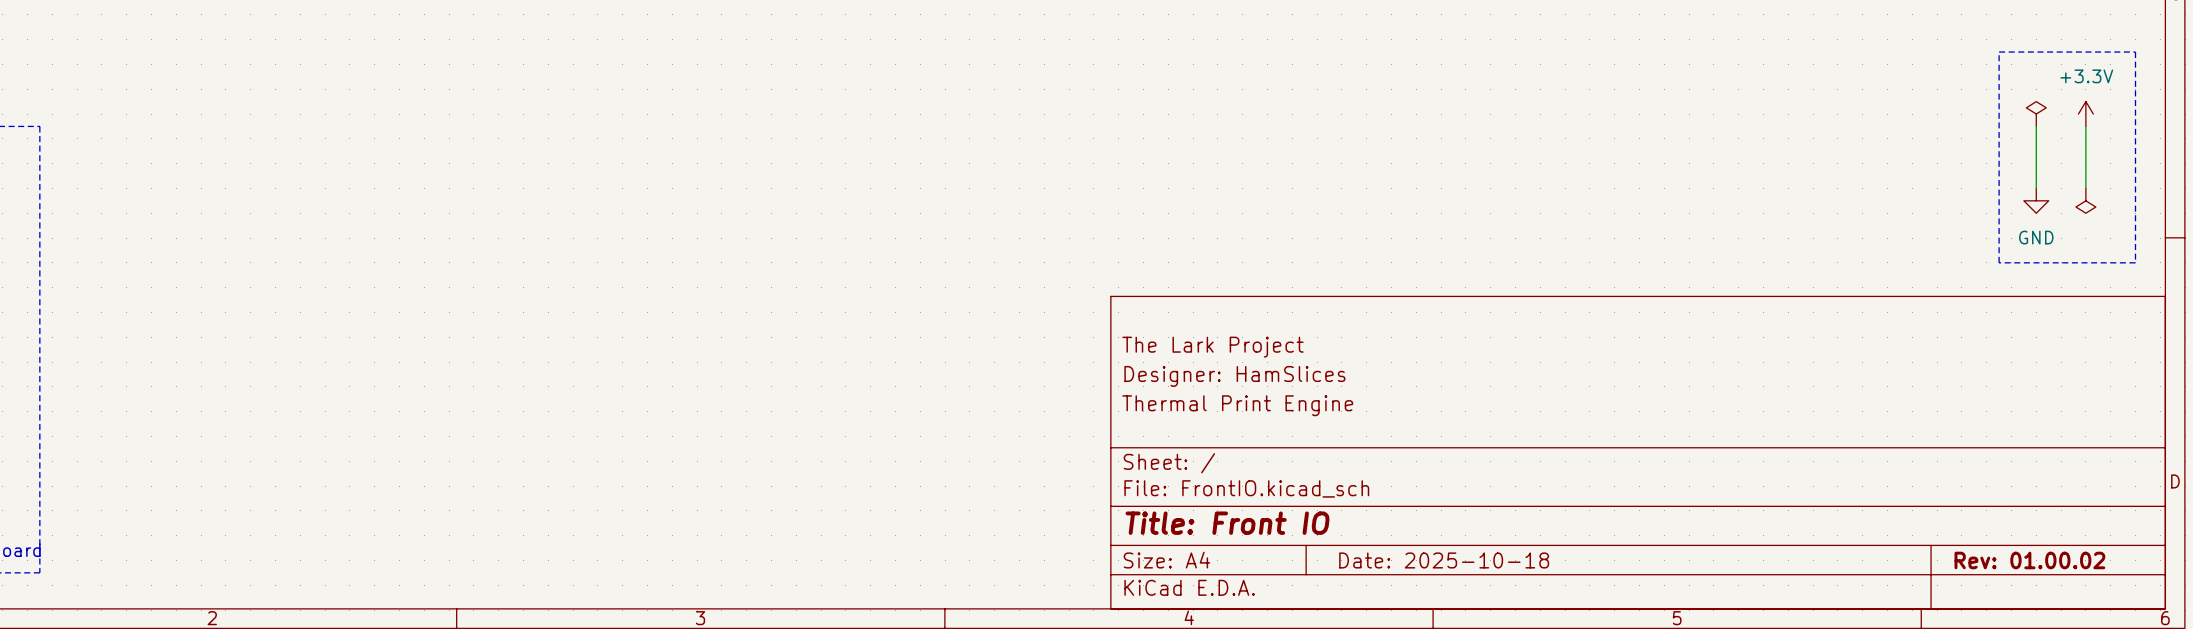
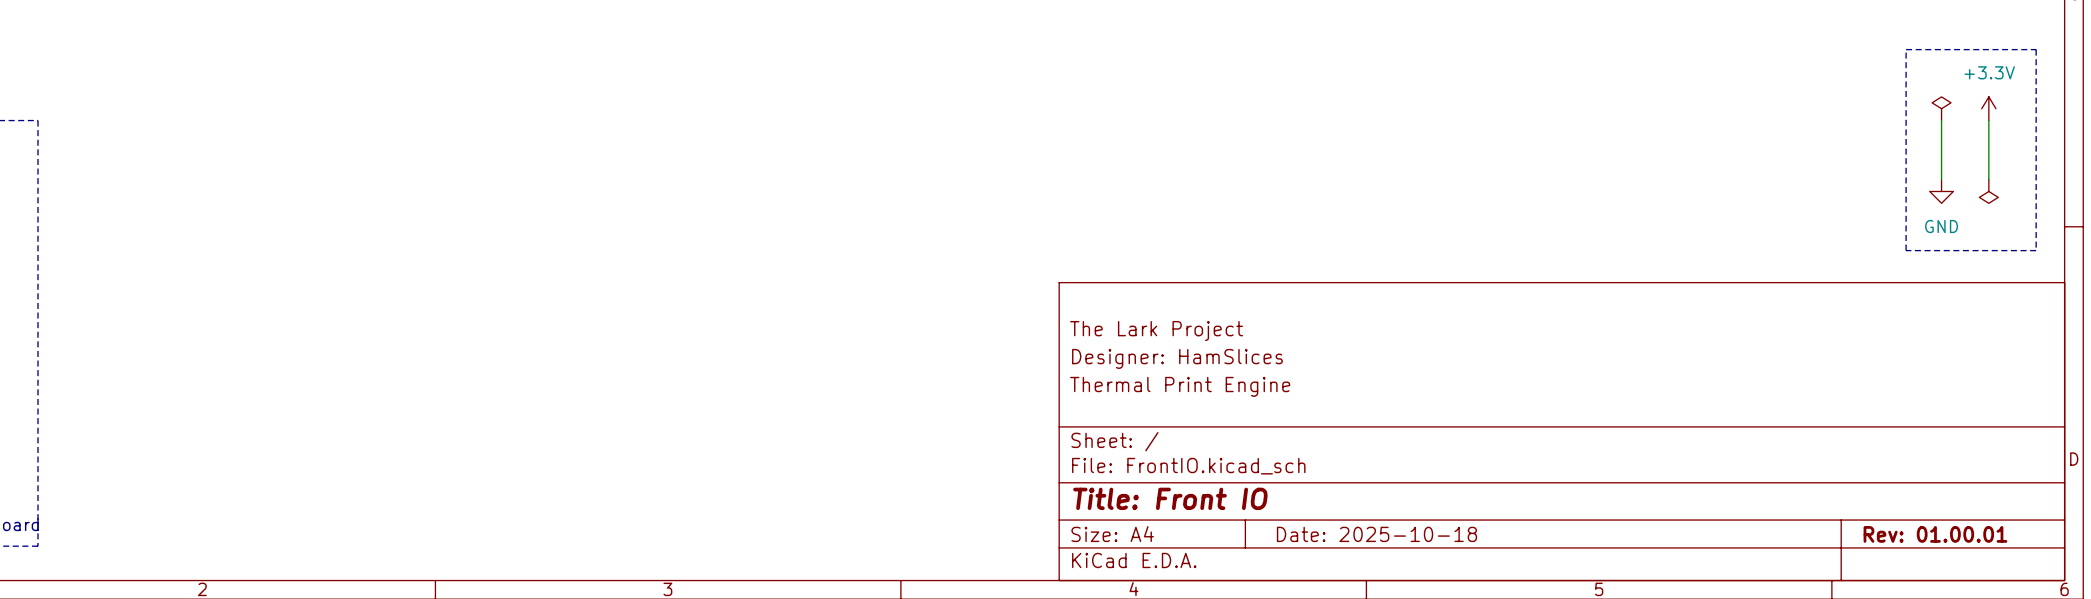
title block: Rev: 01.00.02 (2029, 560) -> Rev: 01.00.01 (1935, 534)

